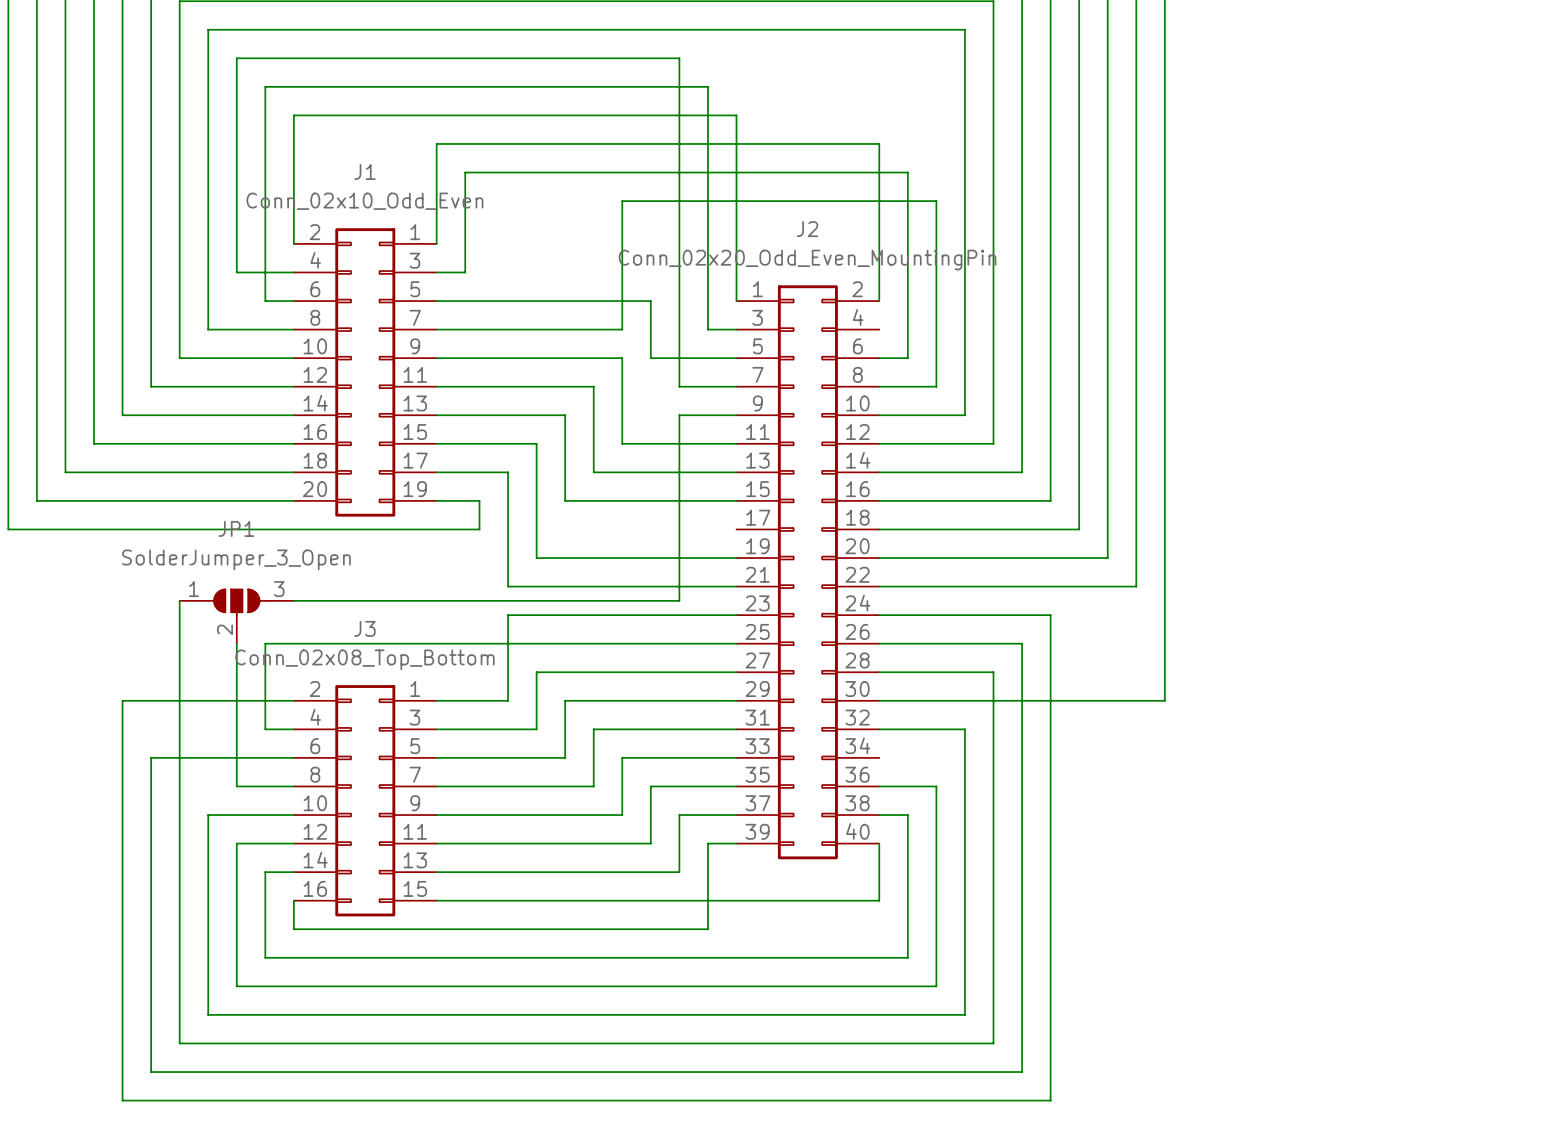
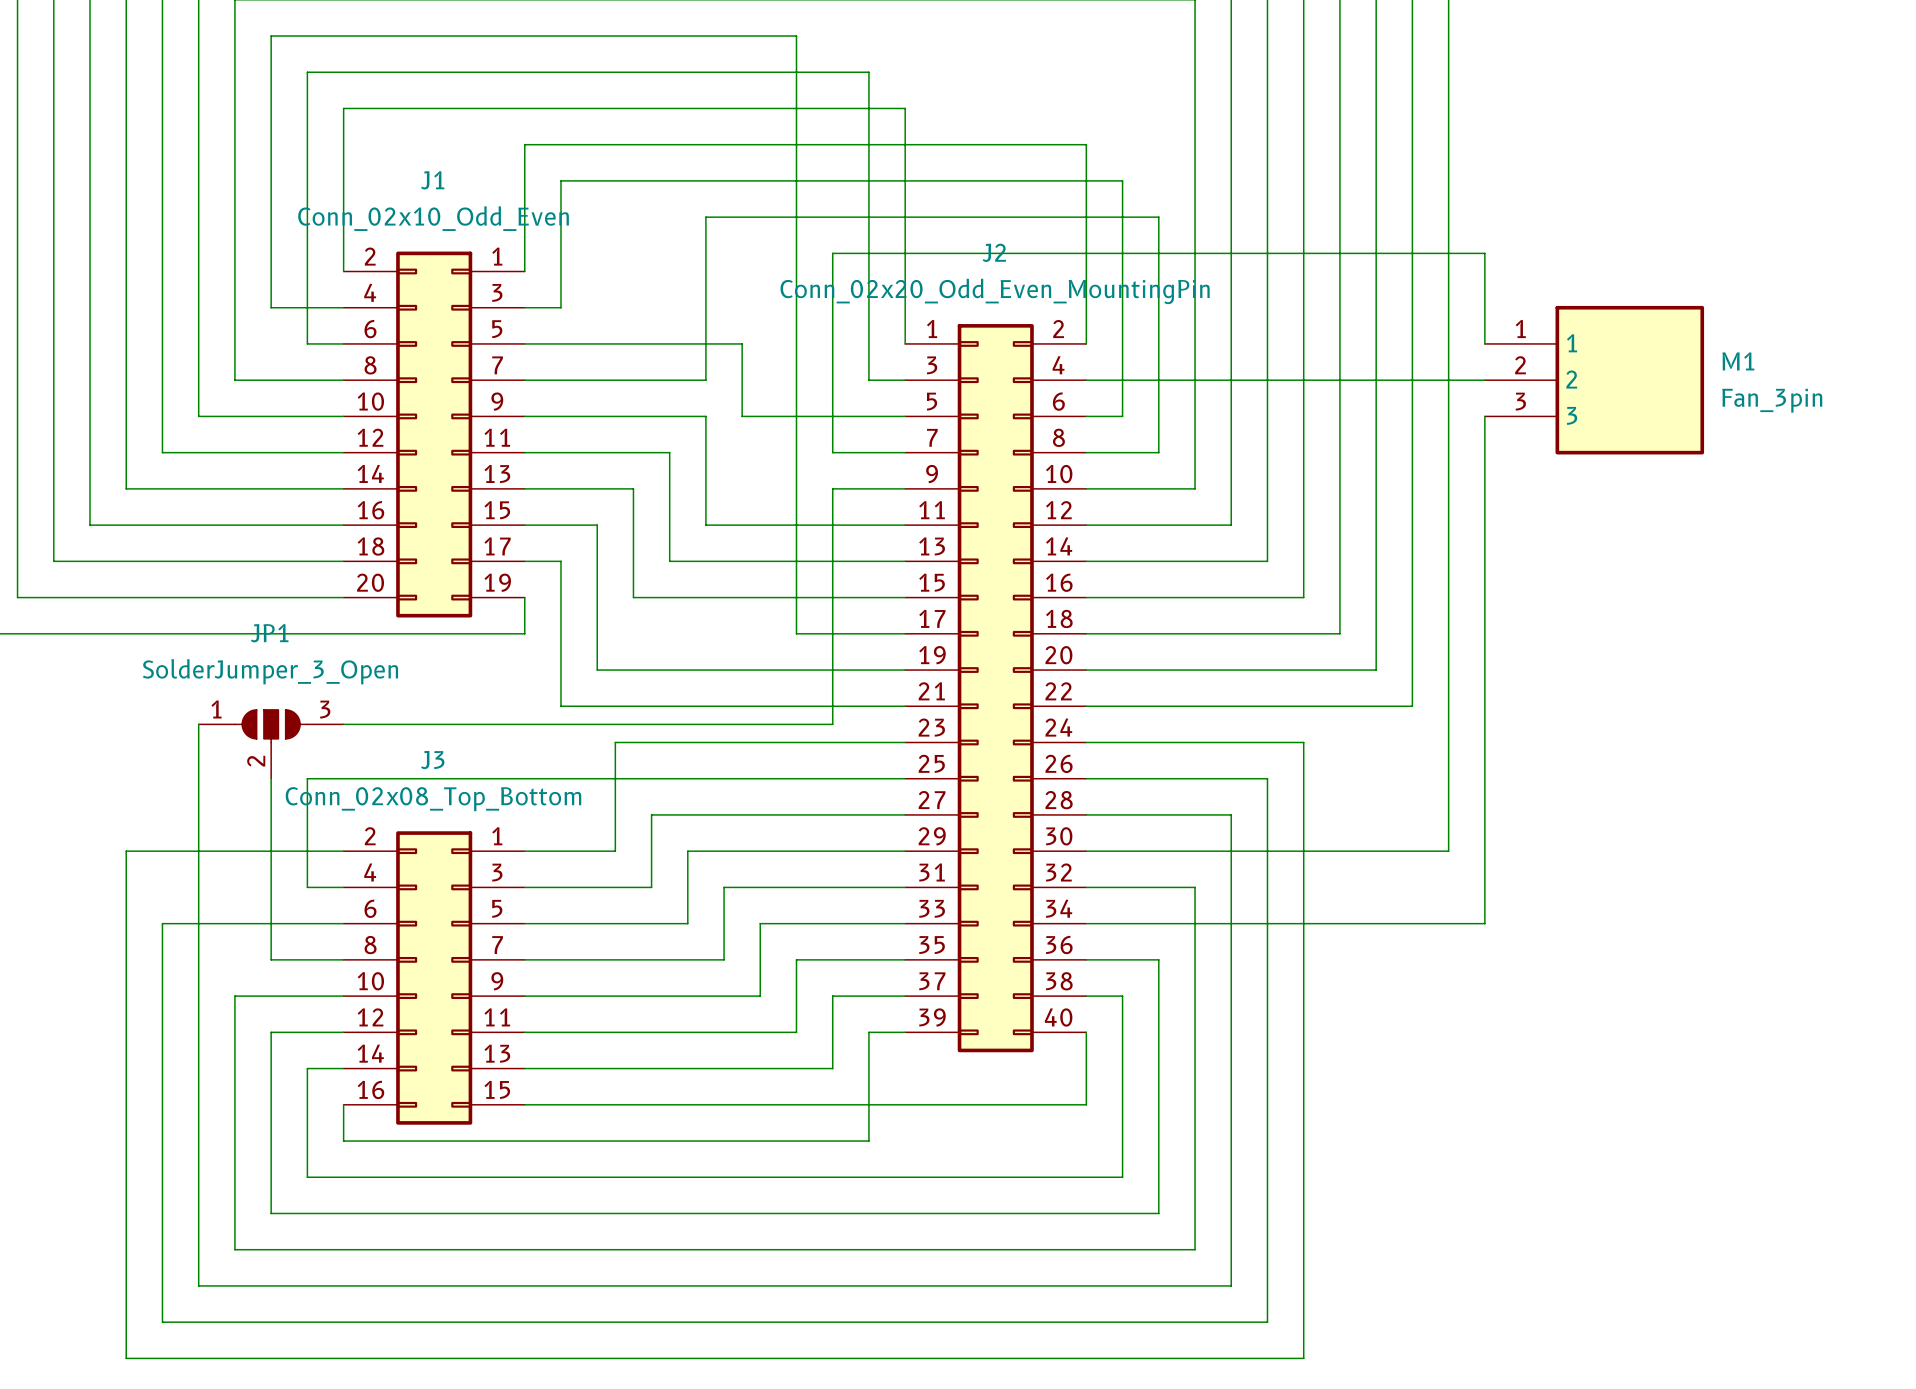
wire: (650, 58) (679, 58) (679, 229) -> (796, 36) (796, 343)
wire: (622, 201) (622, 329) (579, 329) -> (760, 217) (705, 217) (705, 380)
wire: none -> (832, 253) (1484, 253) (1484, 343)
wire: (608, 301) (650, 301) -> none
wire: none -> (1086, 380) (1484, 380)
M1: none -> Fan_3pin (1594, 380)
wire: (579, 358) (608, 358) -> (742, 343) (742, 416)
wire: (622, 358) (622, 443) -> (705, 416) (705, 525) (760, 525)
wire: none -> (760, 416) (796, 416) (796, 633) (905, 633)
wire: none -> (1484, 416) (1484, 923) (1086, 923)
wire: (550, 386) (593, 386) (593, 472) -> (669, 452) (669, 561) (724, 561)
wire: (522, 415) (565, 415) (565, 500) -> (633, 488) (633, 597) (687, 597)
wire: (493, 443) (536, 443) (536, 558) -> (597, 525) (597, 670) (651, 670)
wire: (465, 472) (508, 472) (508, 586) -> (561, 561) (561, 706) (615, 706)
wire: (436, 500) (479, 500) (479, 529) (436, 529) -> (524, 597) (524, 633)

